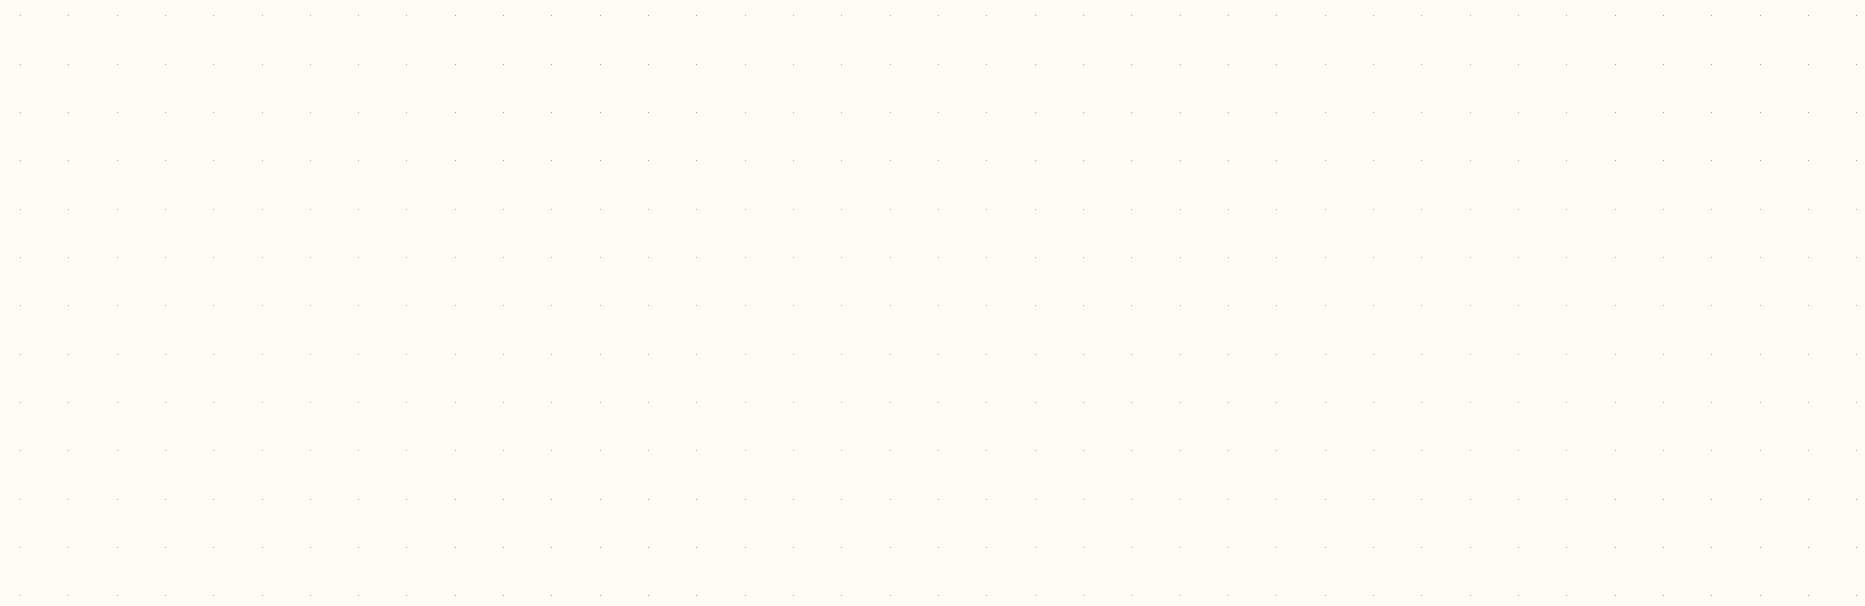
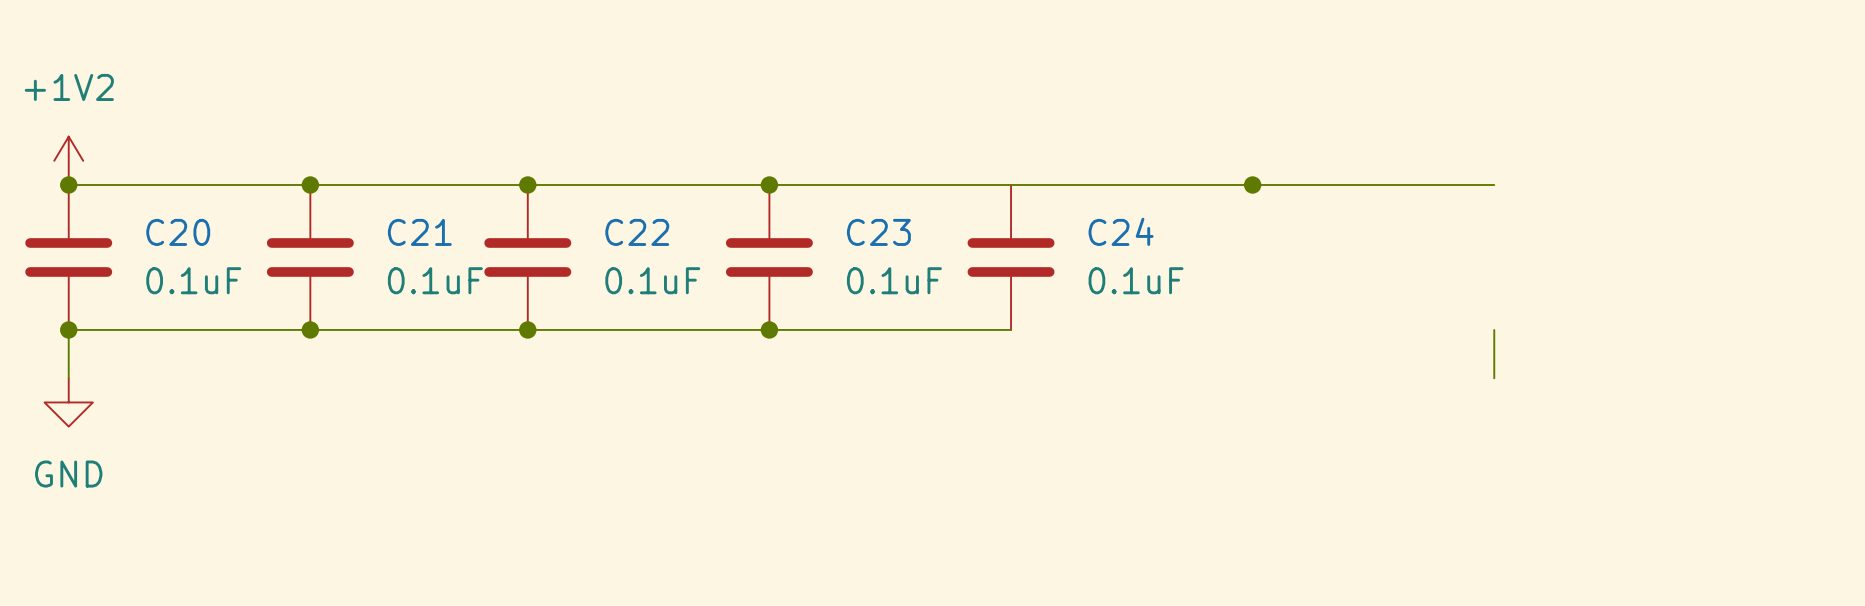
power symbol: none -> +1V2 (68, 160)
wire: none -> (68, 185) (1494, 185)
junction: none -> (68, 185)
junction: none -> (310, 185)
junction: none -> (527, 185)
junction: none -> (769, 185)
junction: none -> (1252, 185)
C20: none -> 0.1uF (68, 257)
C21: none -> 0.1uF (310, 257)
C22: none -> 0.1uF (527, 257)
C23: none -> 0.1uF (769, 257)
C24: none -> 0.1uF (1011, 257)
junction: none -> (68, 329)
junction: none -> (310, 329)
junction: none -> (527, 329)
junction: none -> (769, 329)
wire: none -> (1011, 329) (68, 329) (68, 378)
wire: none -> (1494, 329) (1494, 378)
power symbol: none -> GND (68, 402)

